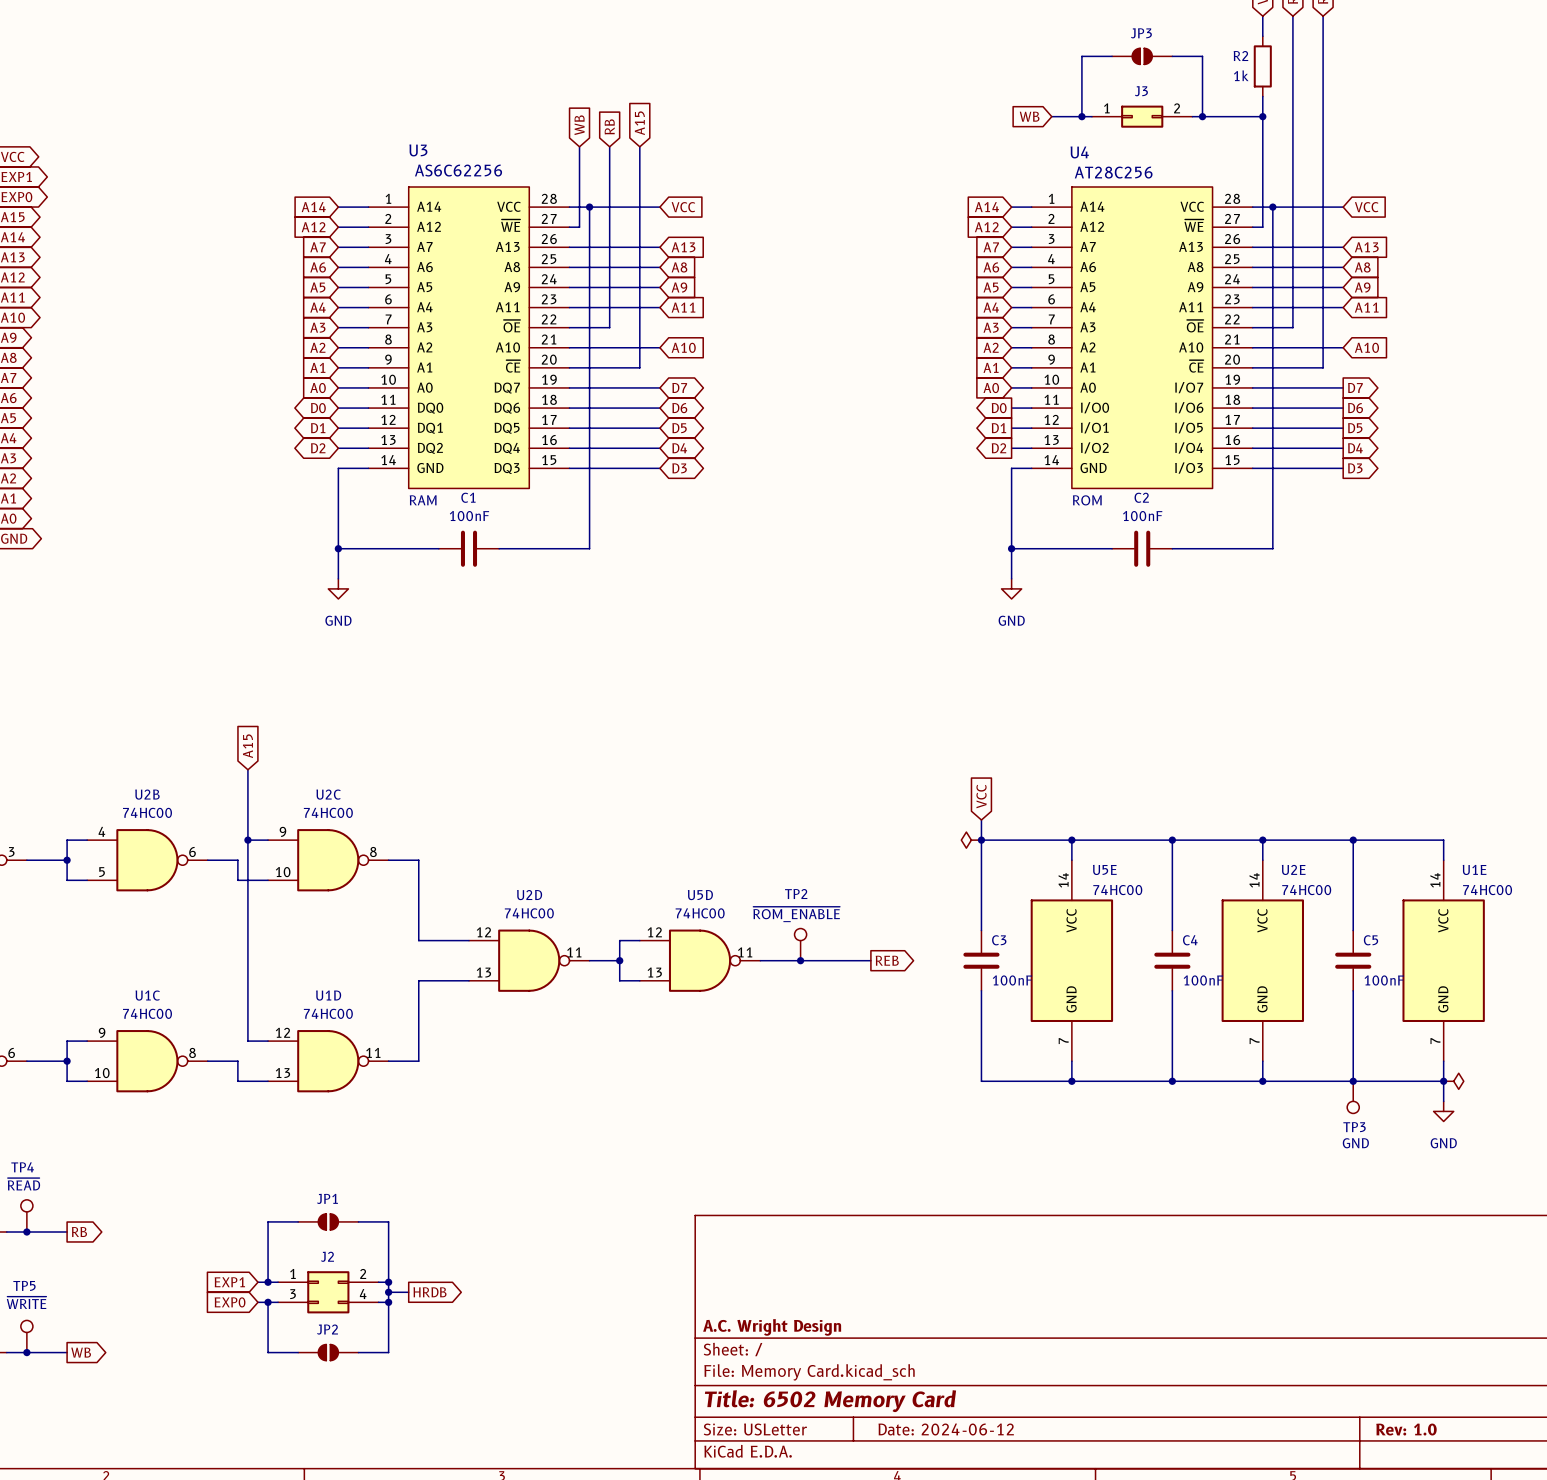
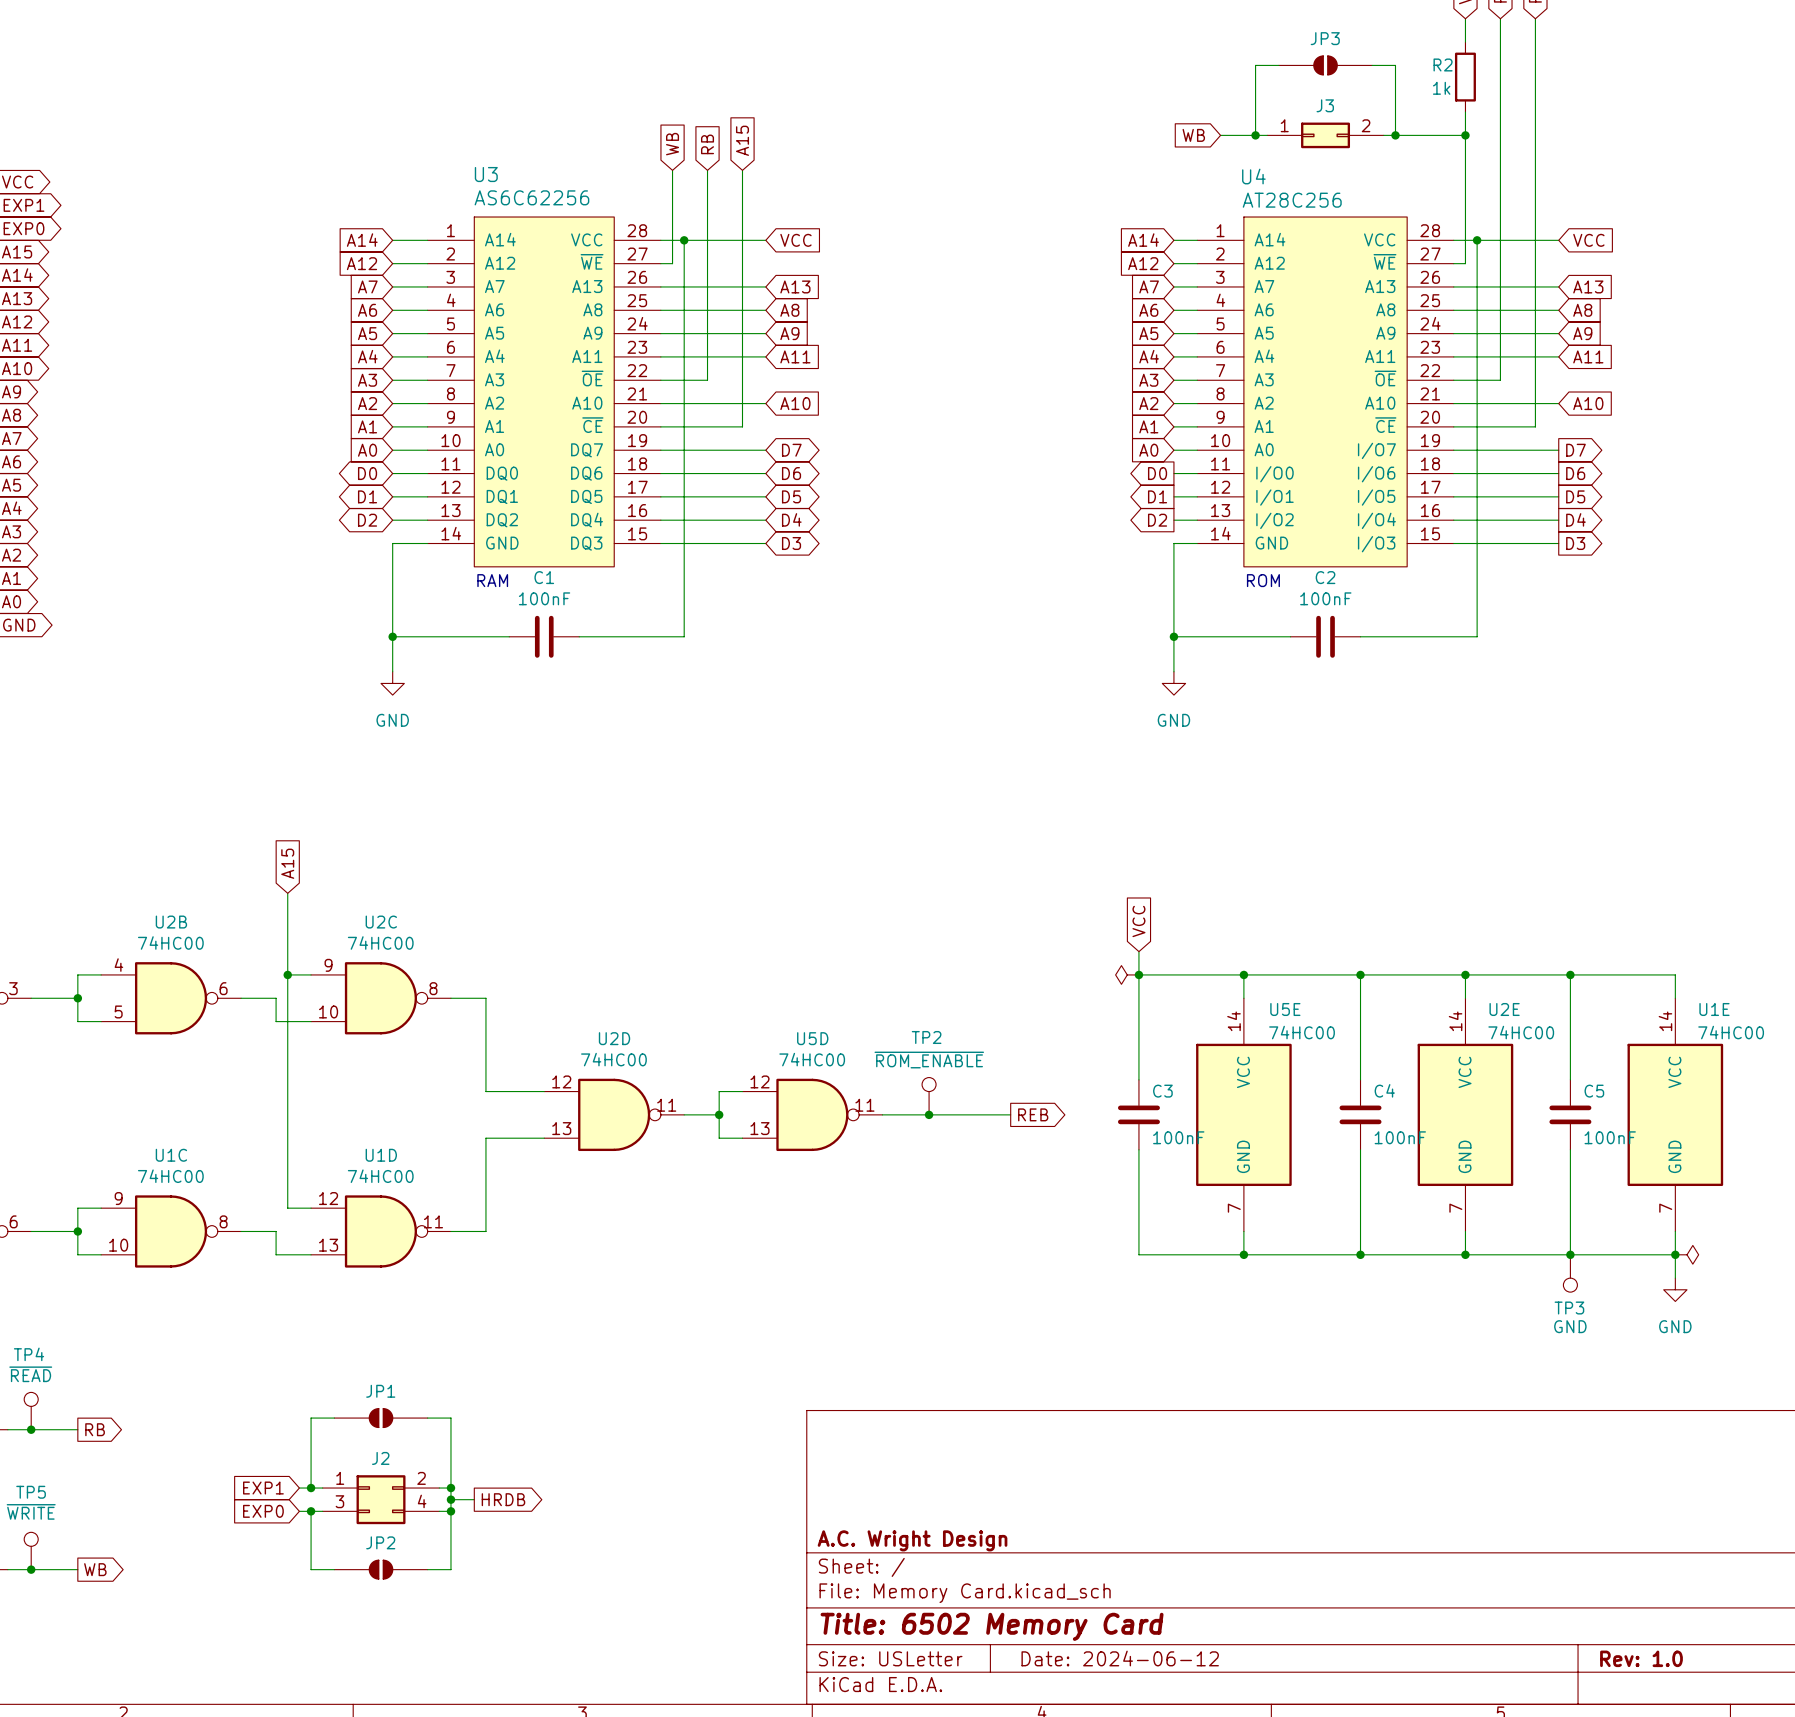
JP3 symbol: [1112, 48, 1173, 65] -> [1278, 55, 1373, 76]
JP1 symbol: [298, 1213, 359, 1230] -> [334, 1408, 428, 1429]
JP2 symbol: [298, 1344, 359, 1361] -> [334, 1559, 428, 1580]

